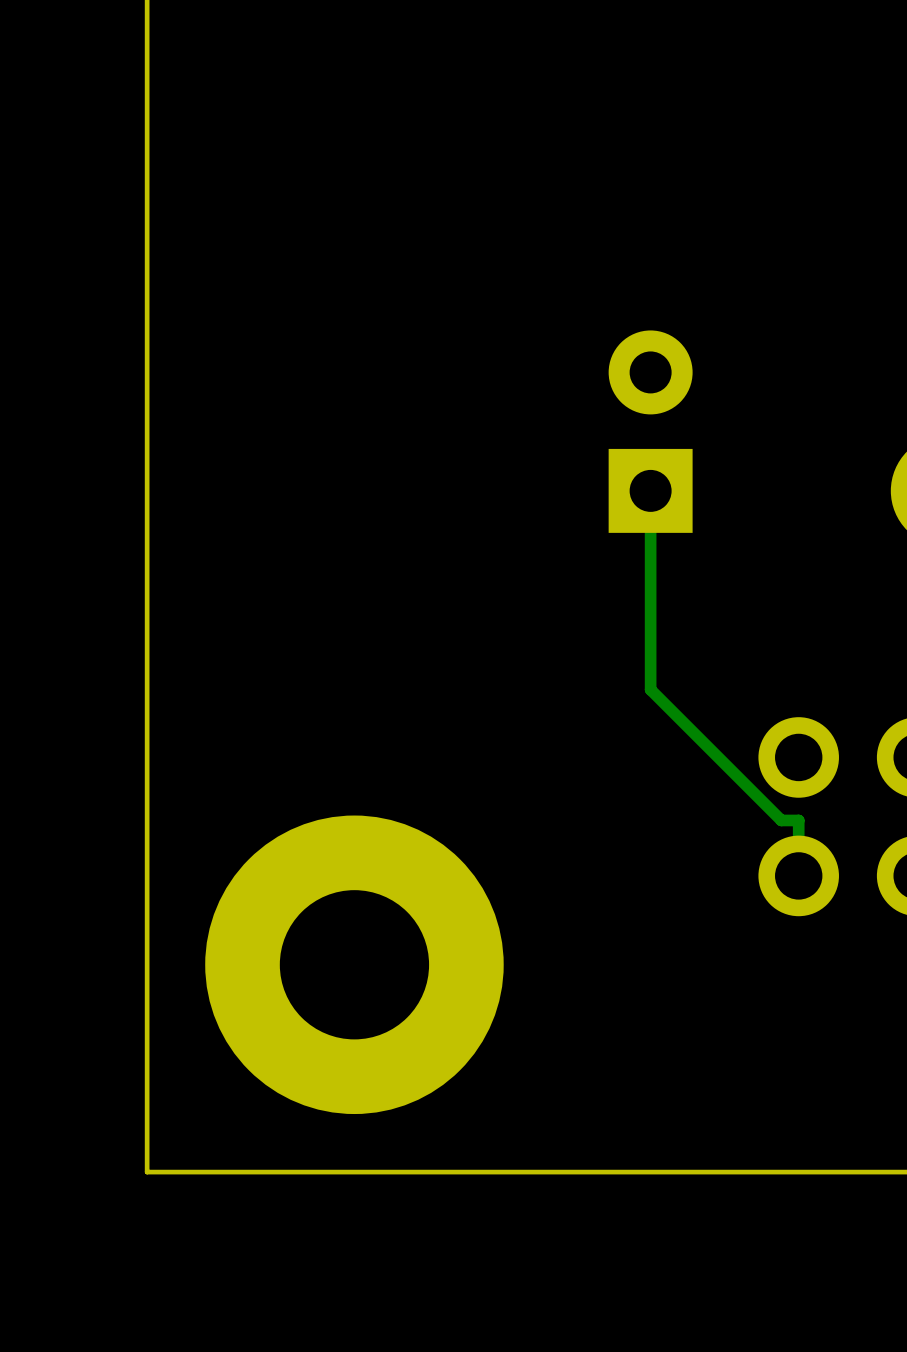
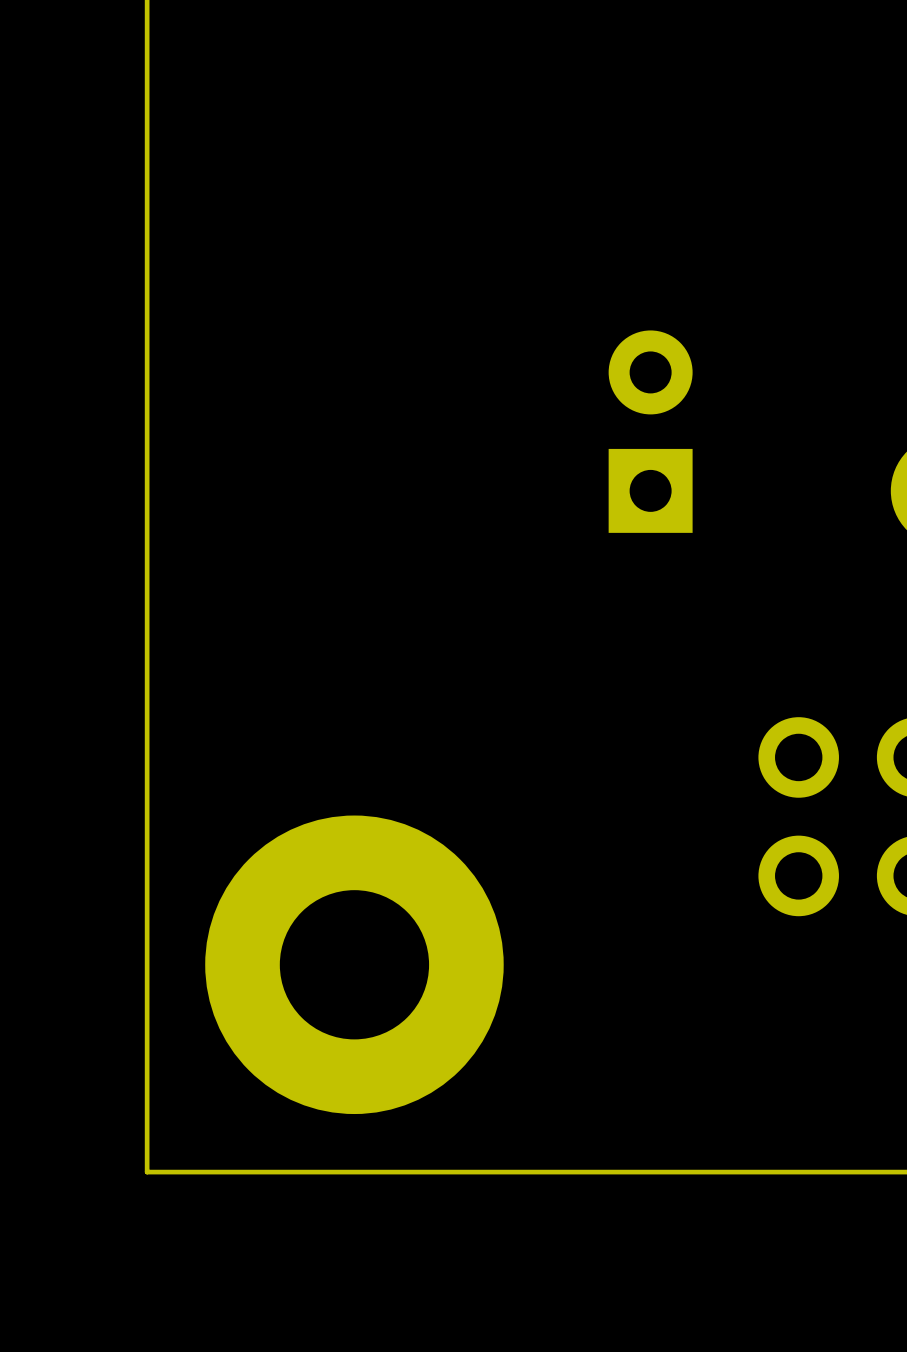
track: (650, 490) (650, 689) (781, 820) (798, 820) (798, 875) -> none

